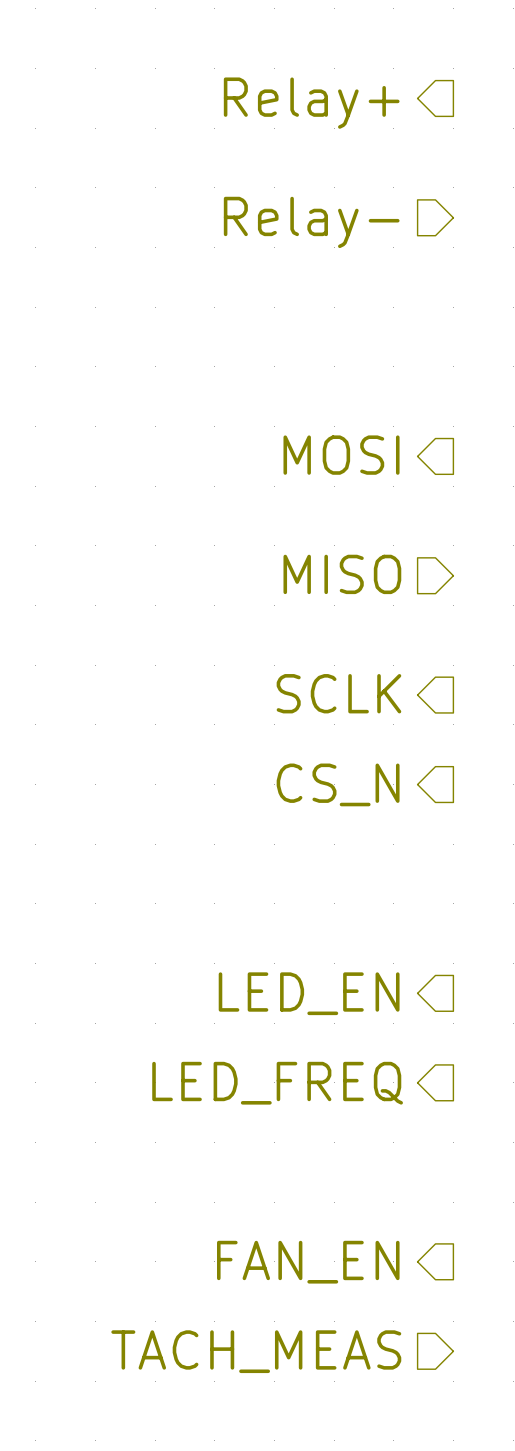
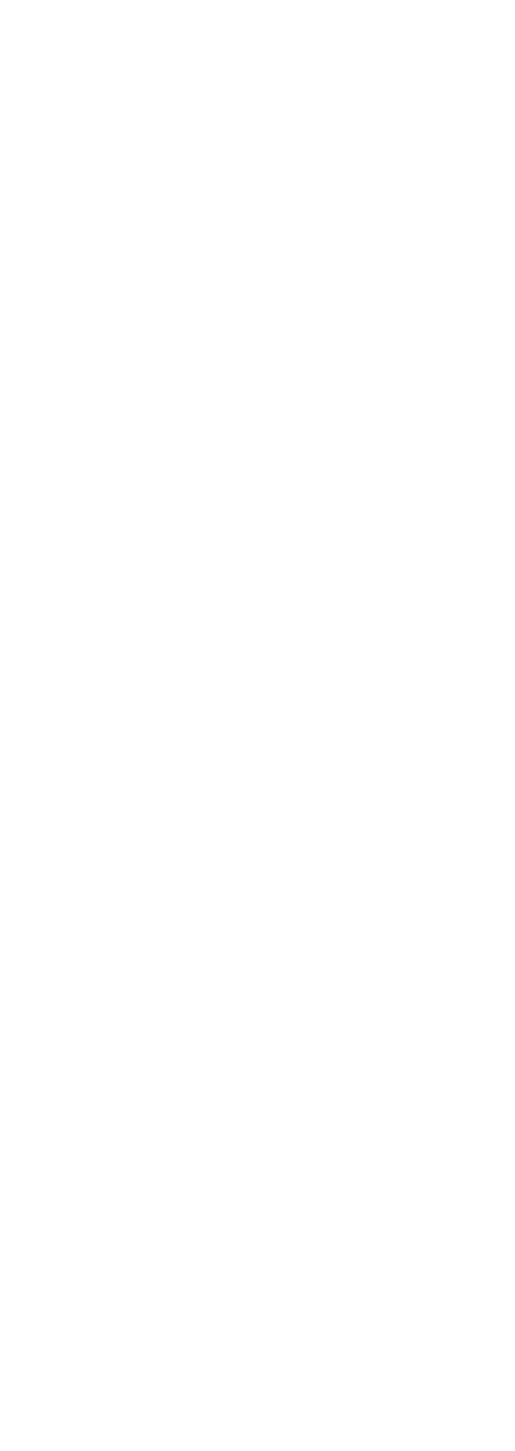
hierarchical label: Relay+ (311, 103) -> none
hierarchical label: Relay- (311, 222) -> none
hierarchical label: MOSI (341, 455) -> none
hierarchical label: MISO (342, 574) -> none
hierarchical label: SCLK (338, 693) -> none
hierarchical label: CS_N (338, 784) -> none
hierarchical label: LED_EN (309, 993) -> none
hierarchical label: LED_FREQ (277, 1083) -> none
hierarchical label: FAN_EN (308, 1262) -> none
hierarchical label: TACH_MEAS (256, 1351) -> none

